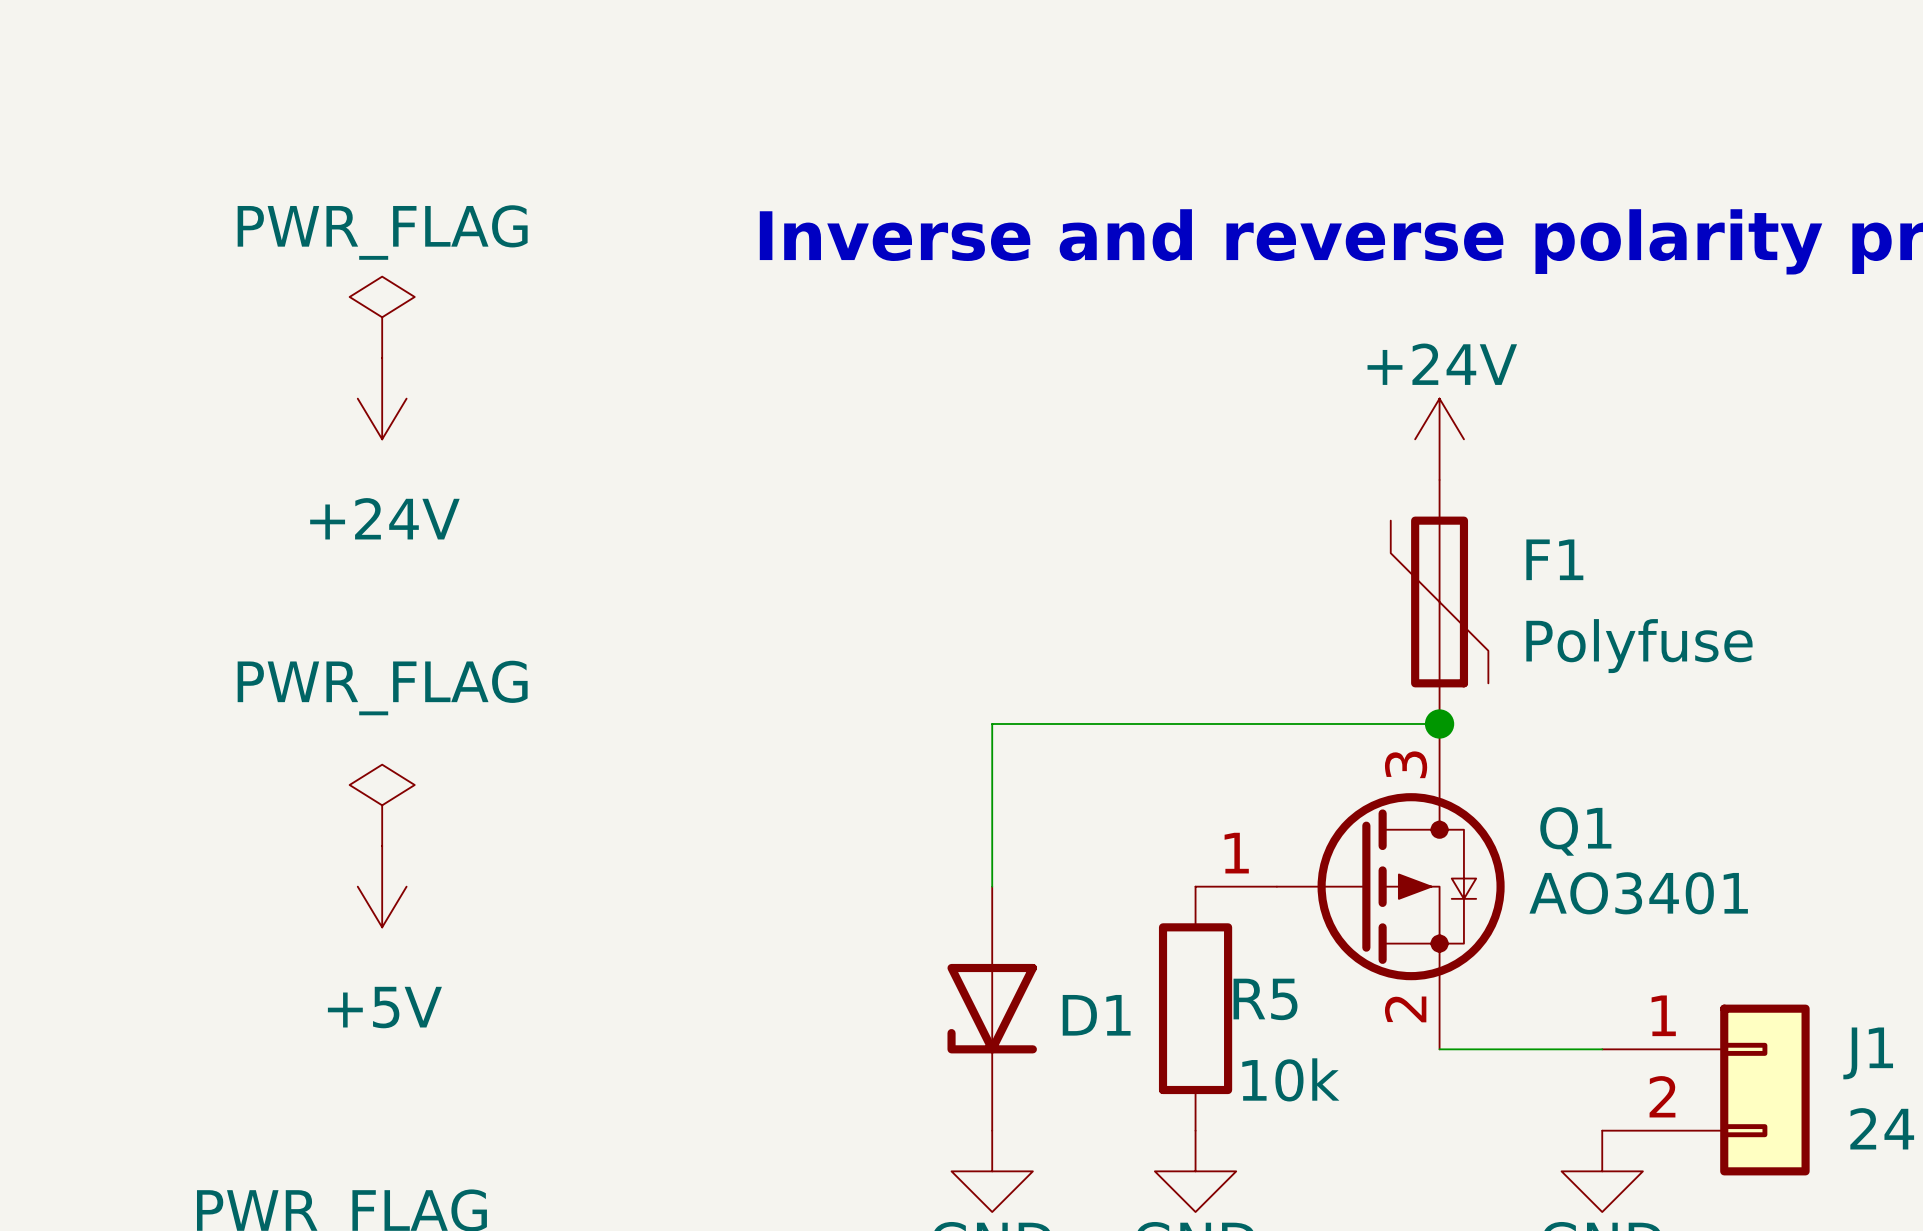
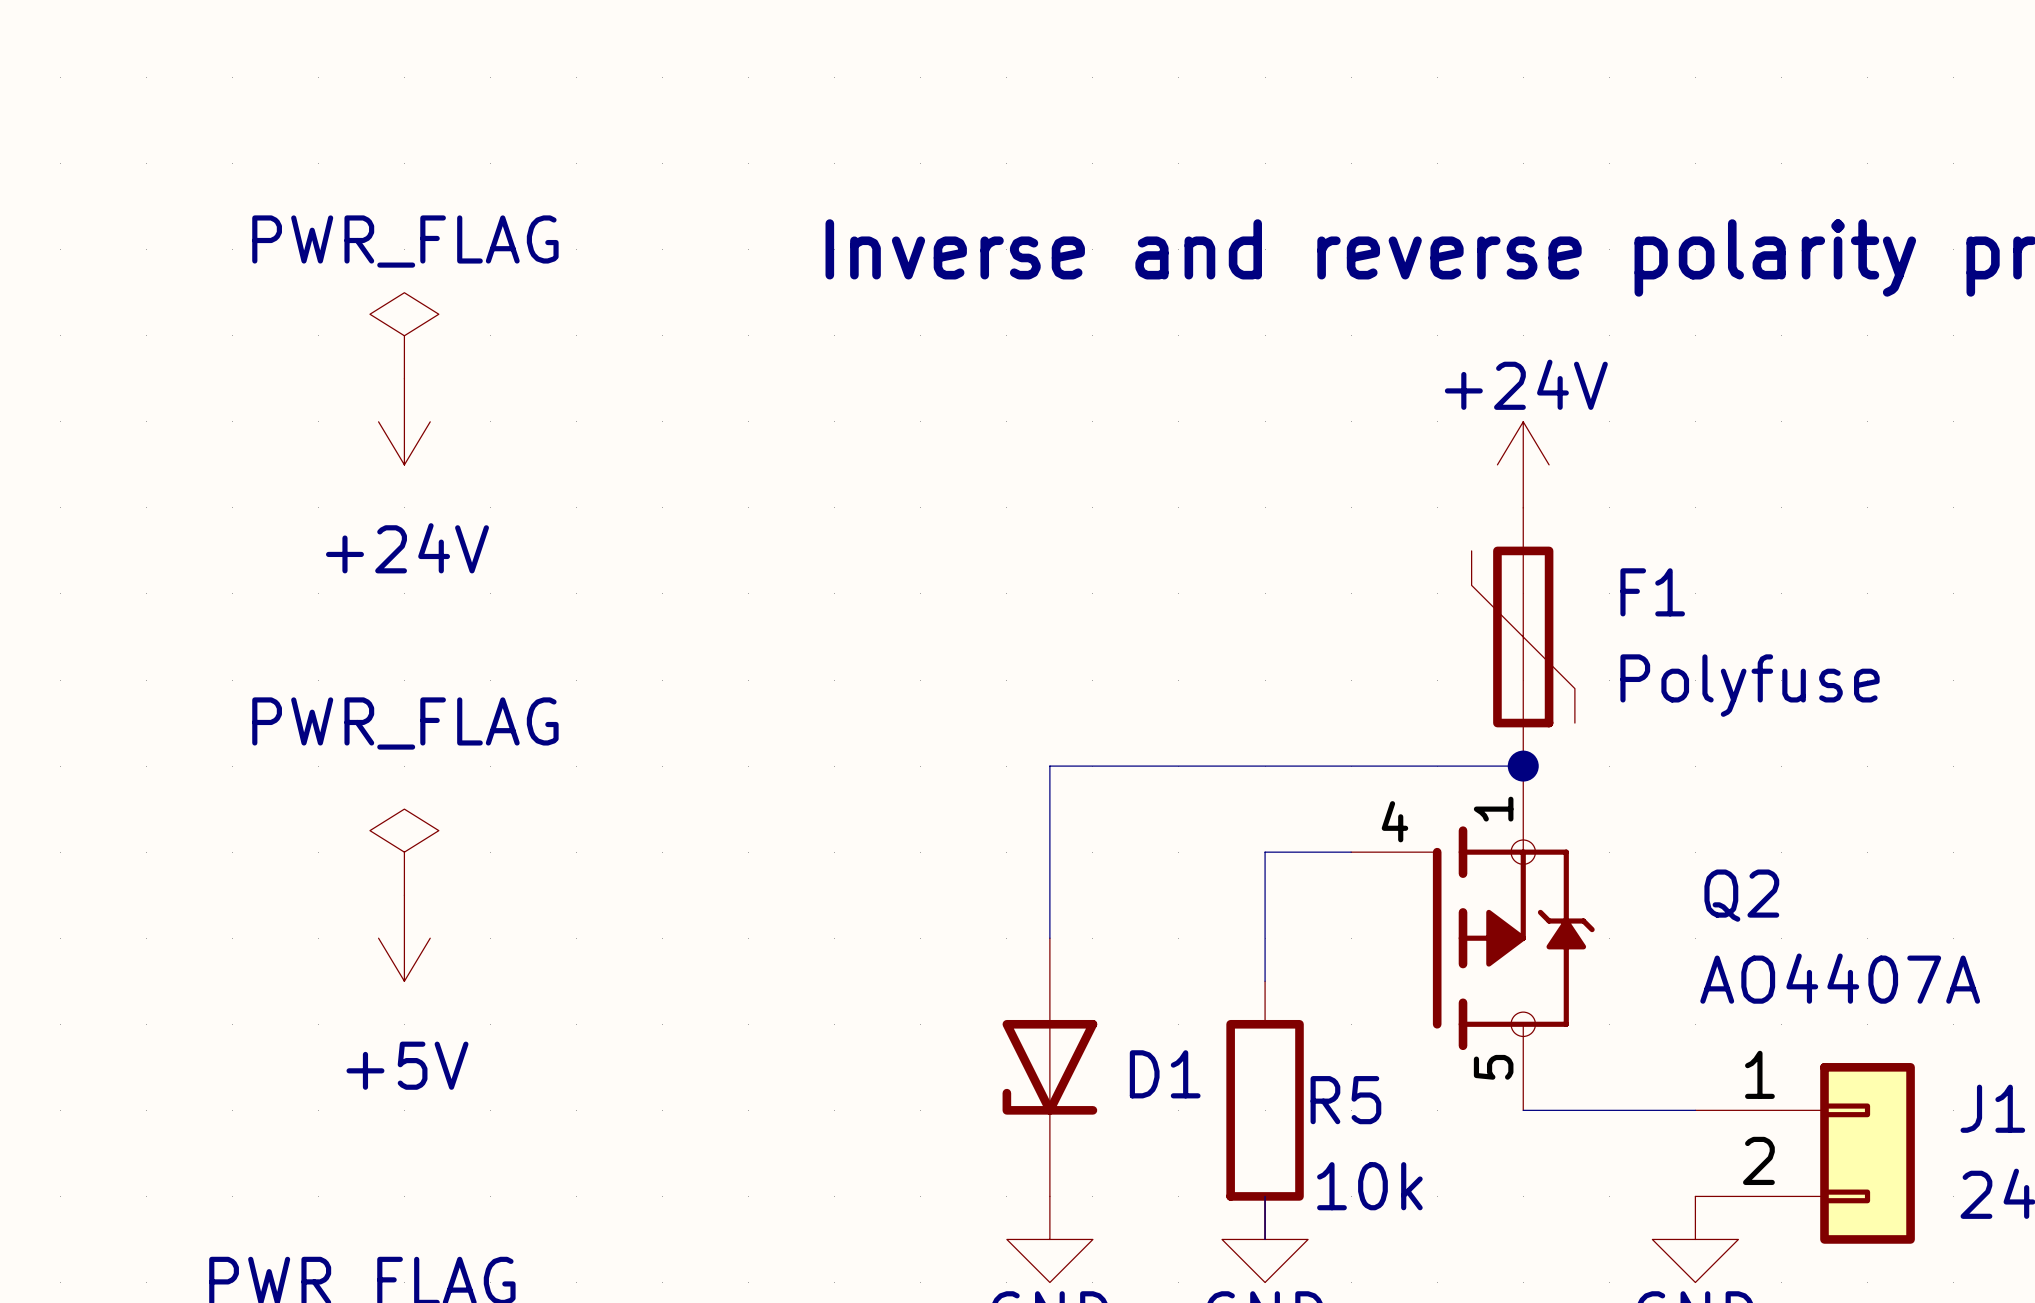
wire: none -> (1351, 852) (1265, 852) (1265, 981)
Q1: AO3401 (1350, 886) -> none
Q2: none -> AO4407A (1472, 938)
R5 position: (1195, 1008) -> (1265, 1110)

